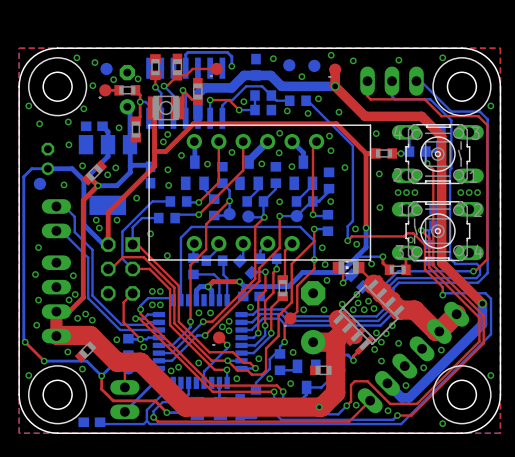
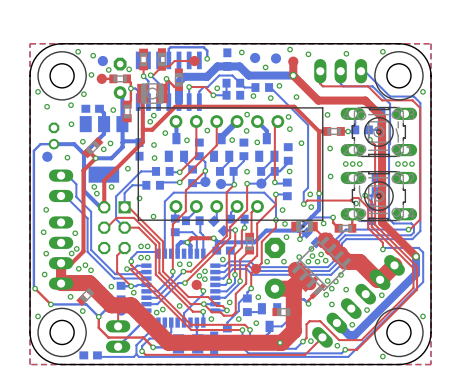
bottom track: (240, 415) (242, 417) (255, 417) -> none

